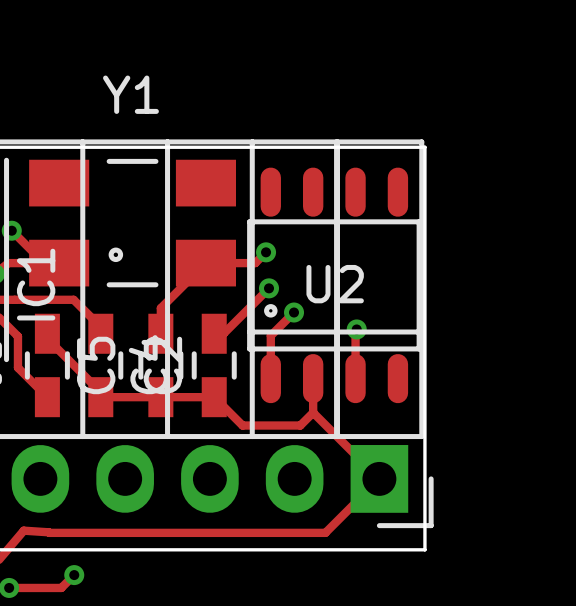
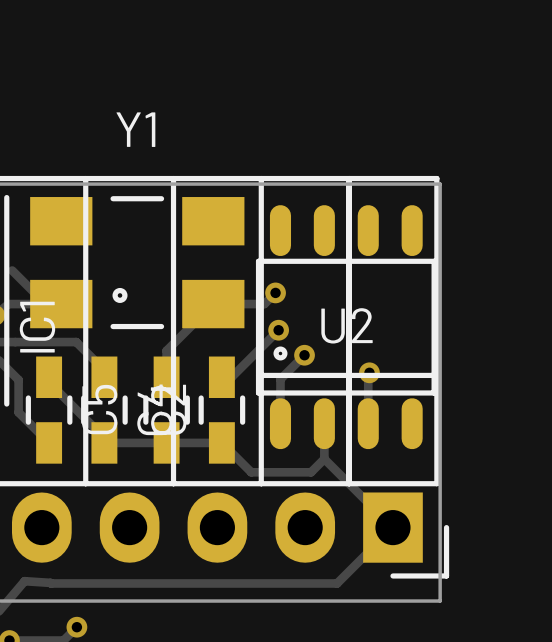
via: (11, 230) -> none

